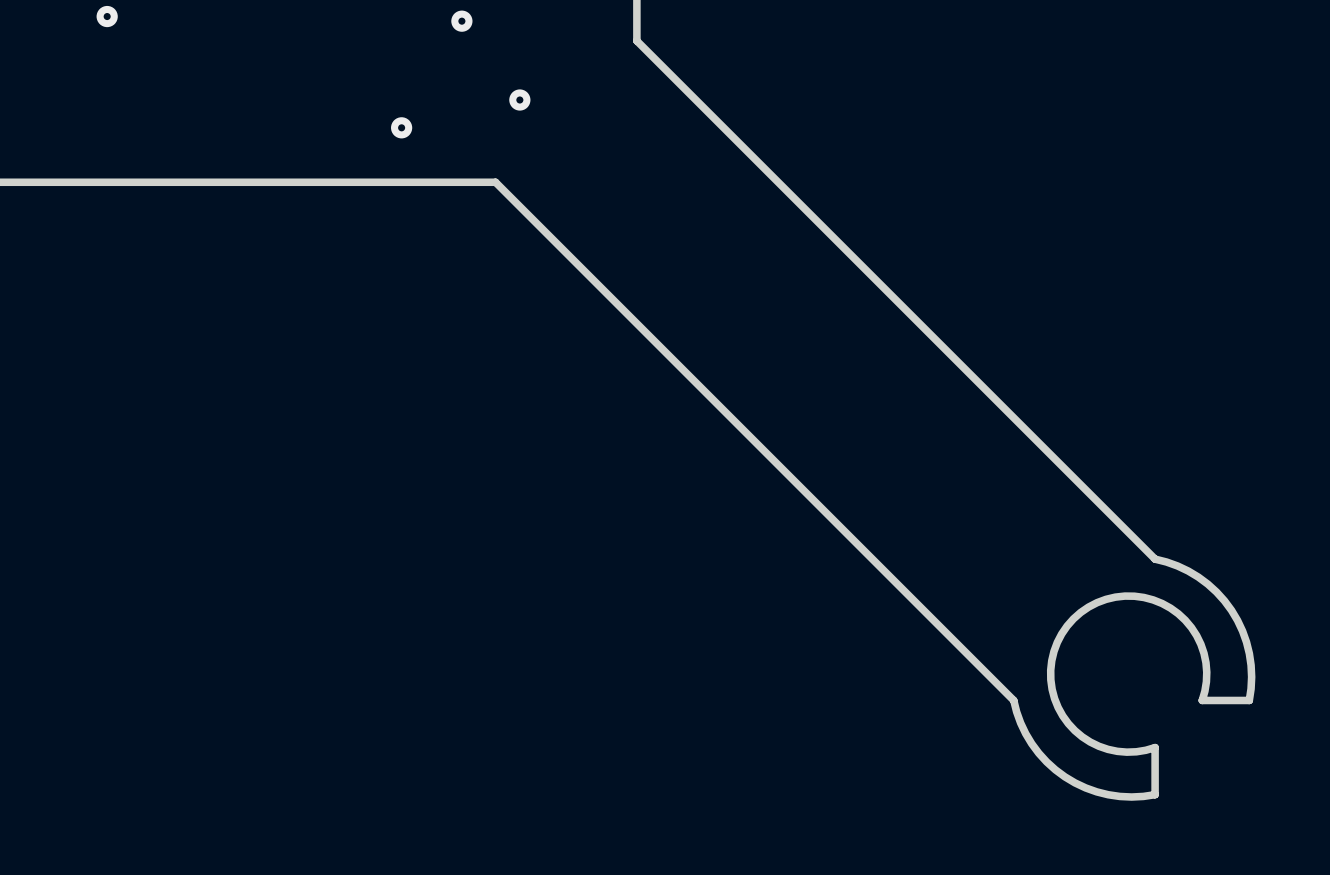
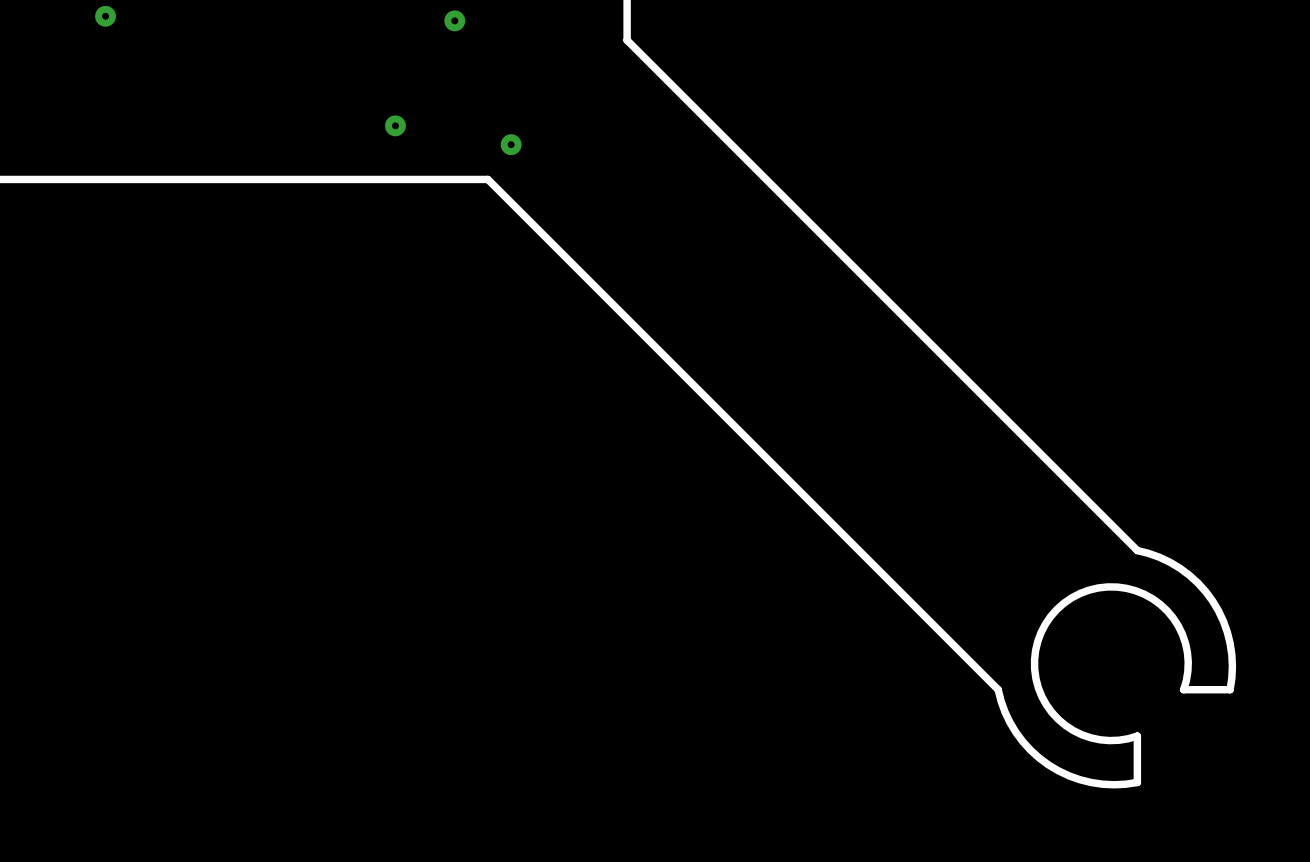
via position: (519, 100) -> (511, 144)

